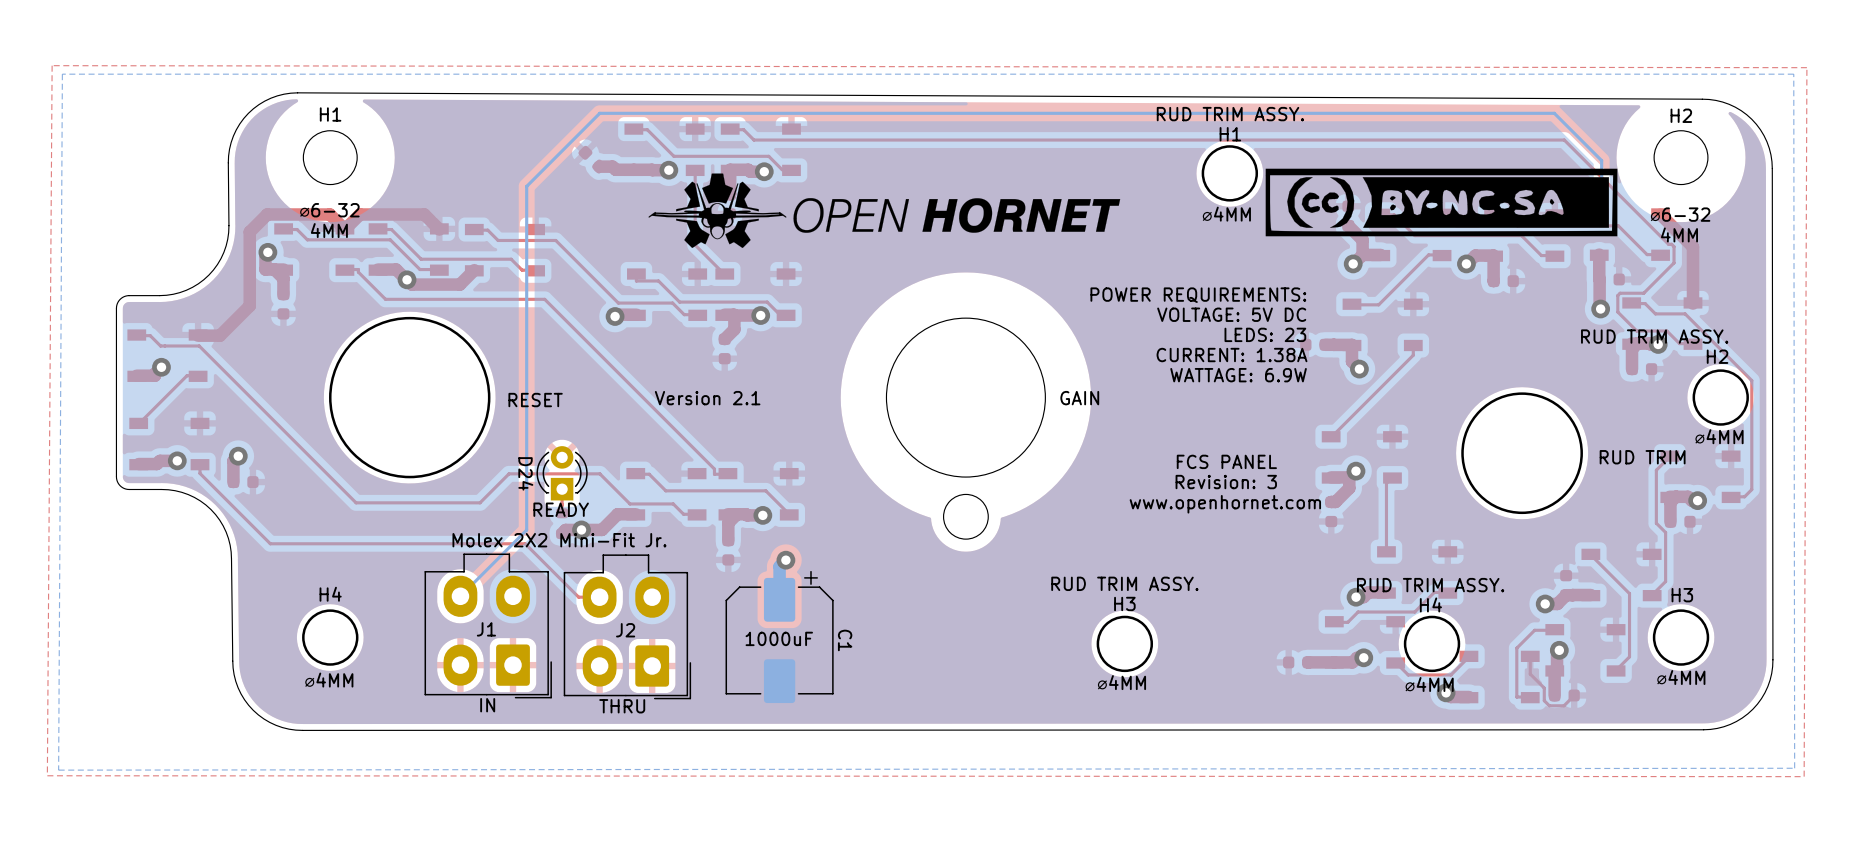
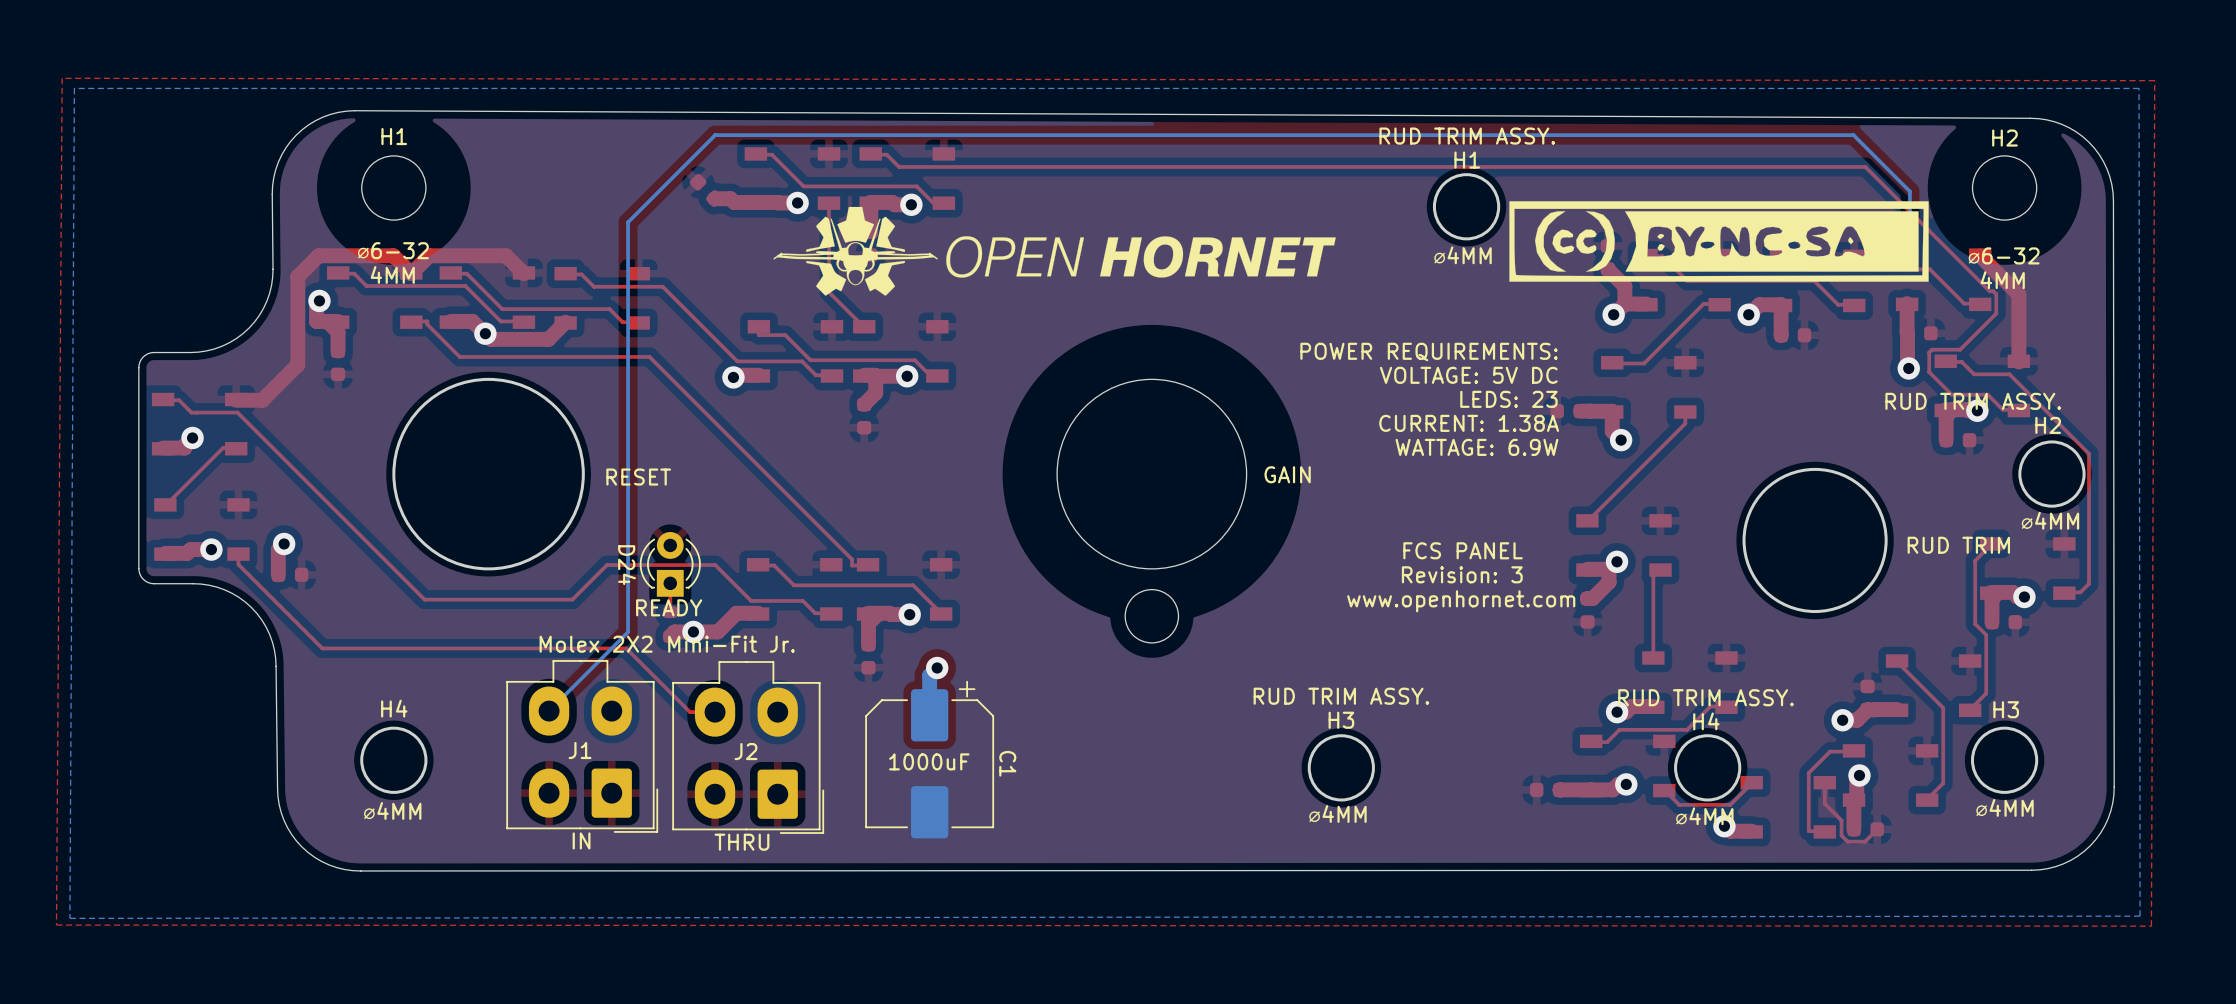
text: Version 2.1 (707, 398) -> none

